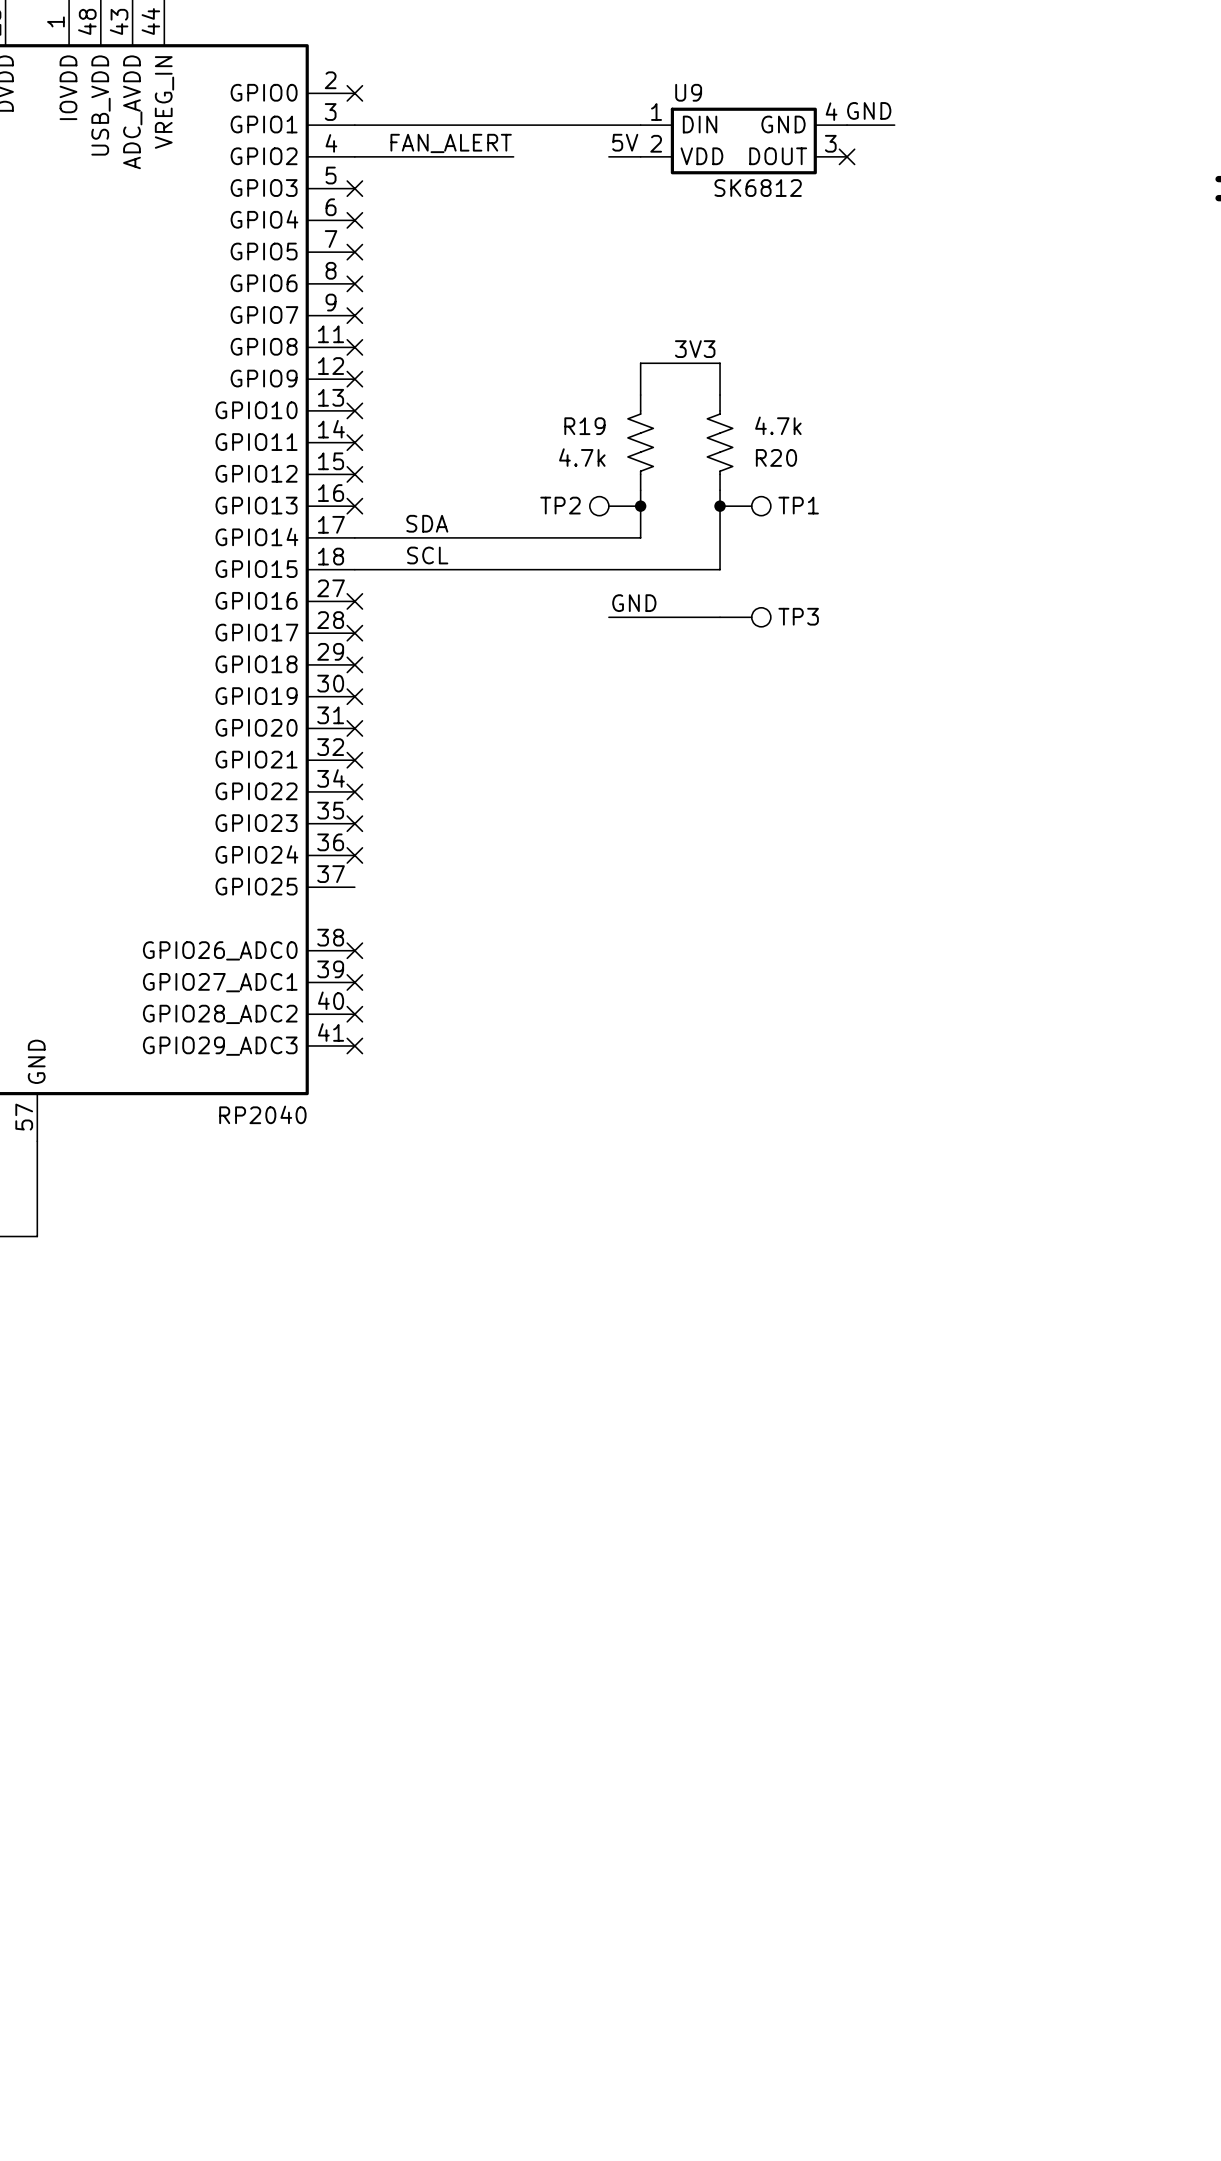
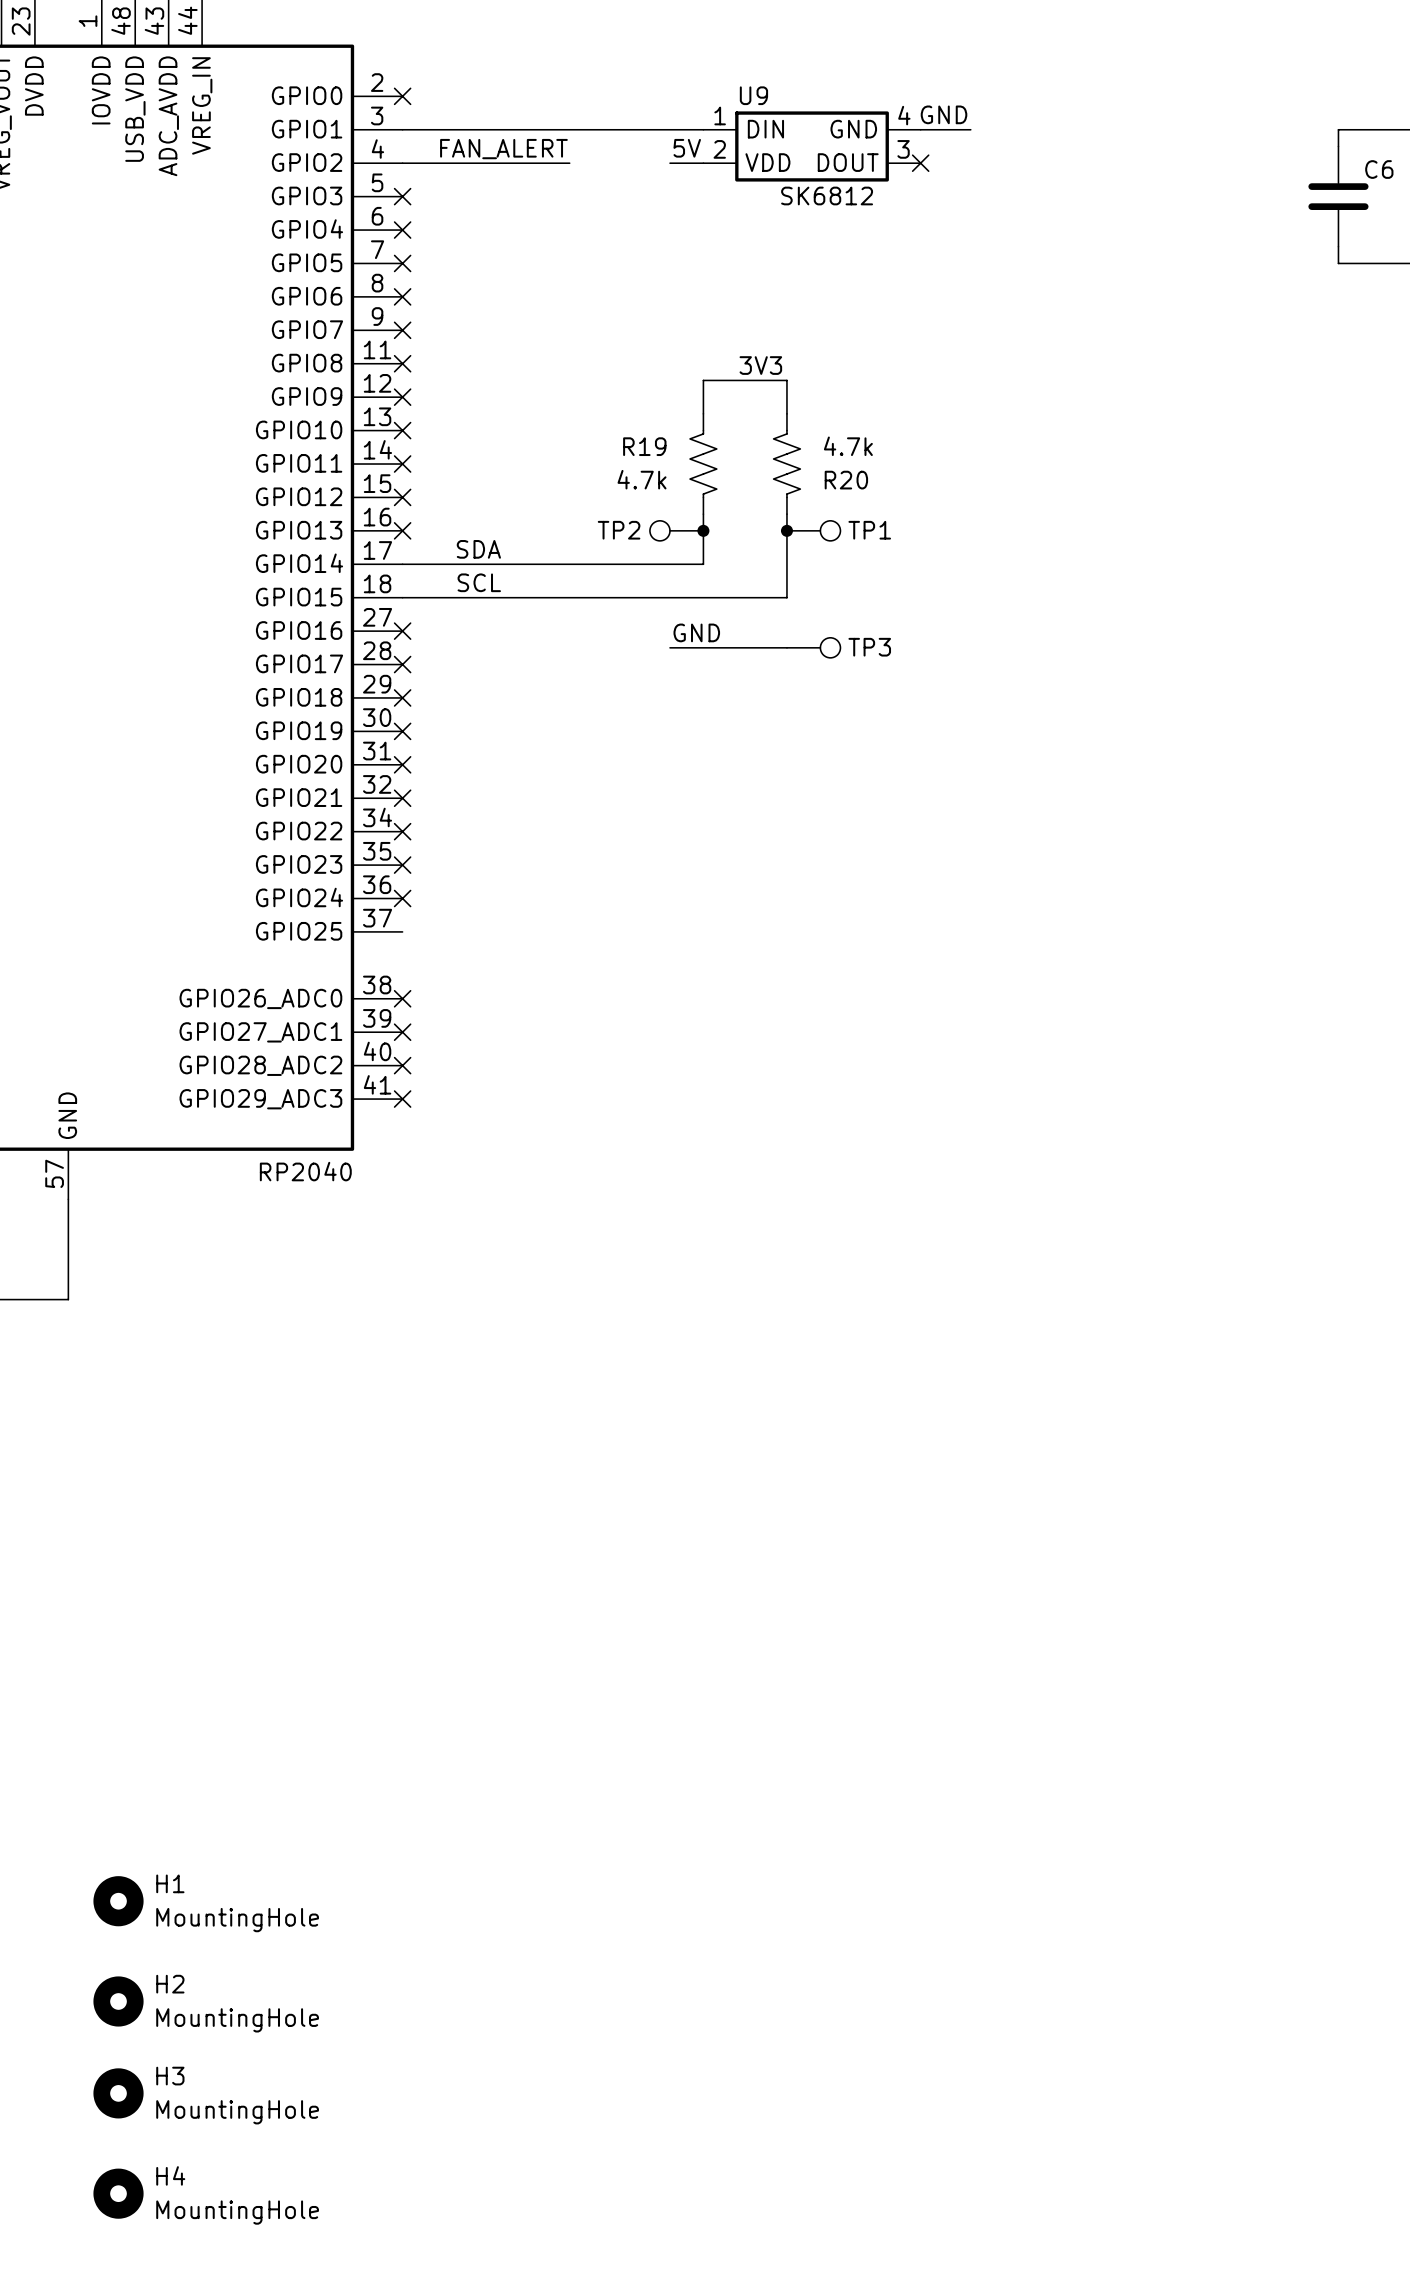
H1: none -> MountingHole (118, 1901)
H2: none -> MountingHole (118, 2001)
H3: none -> MountingHole (118, 2093)
H4: none -> MountingHole (118, 2193)

